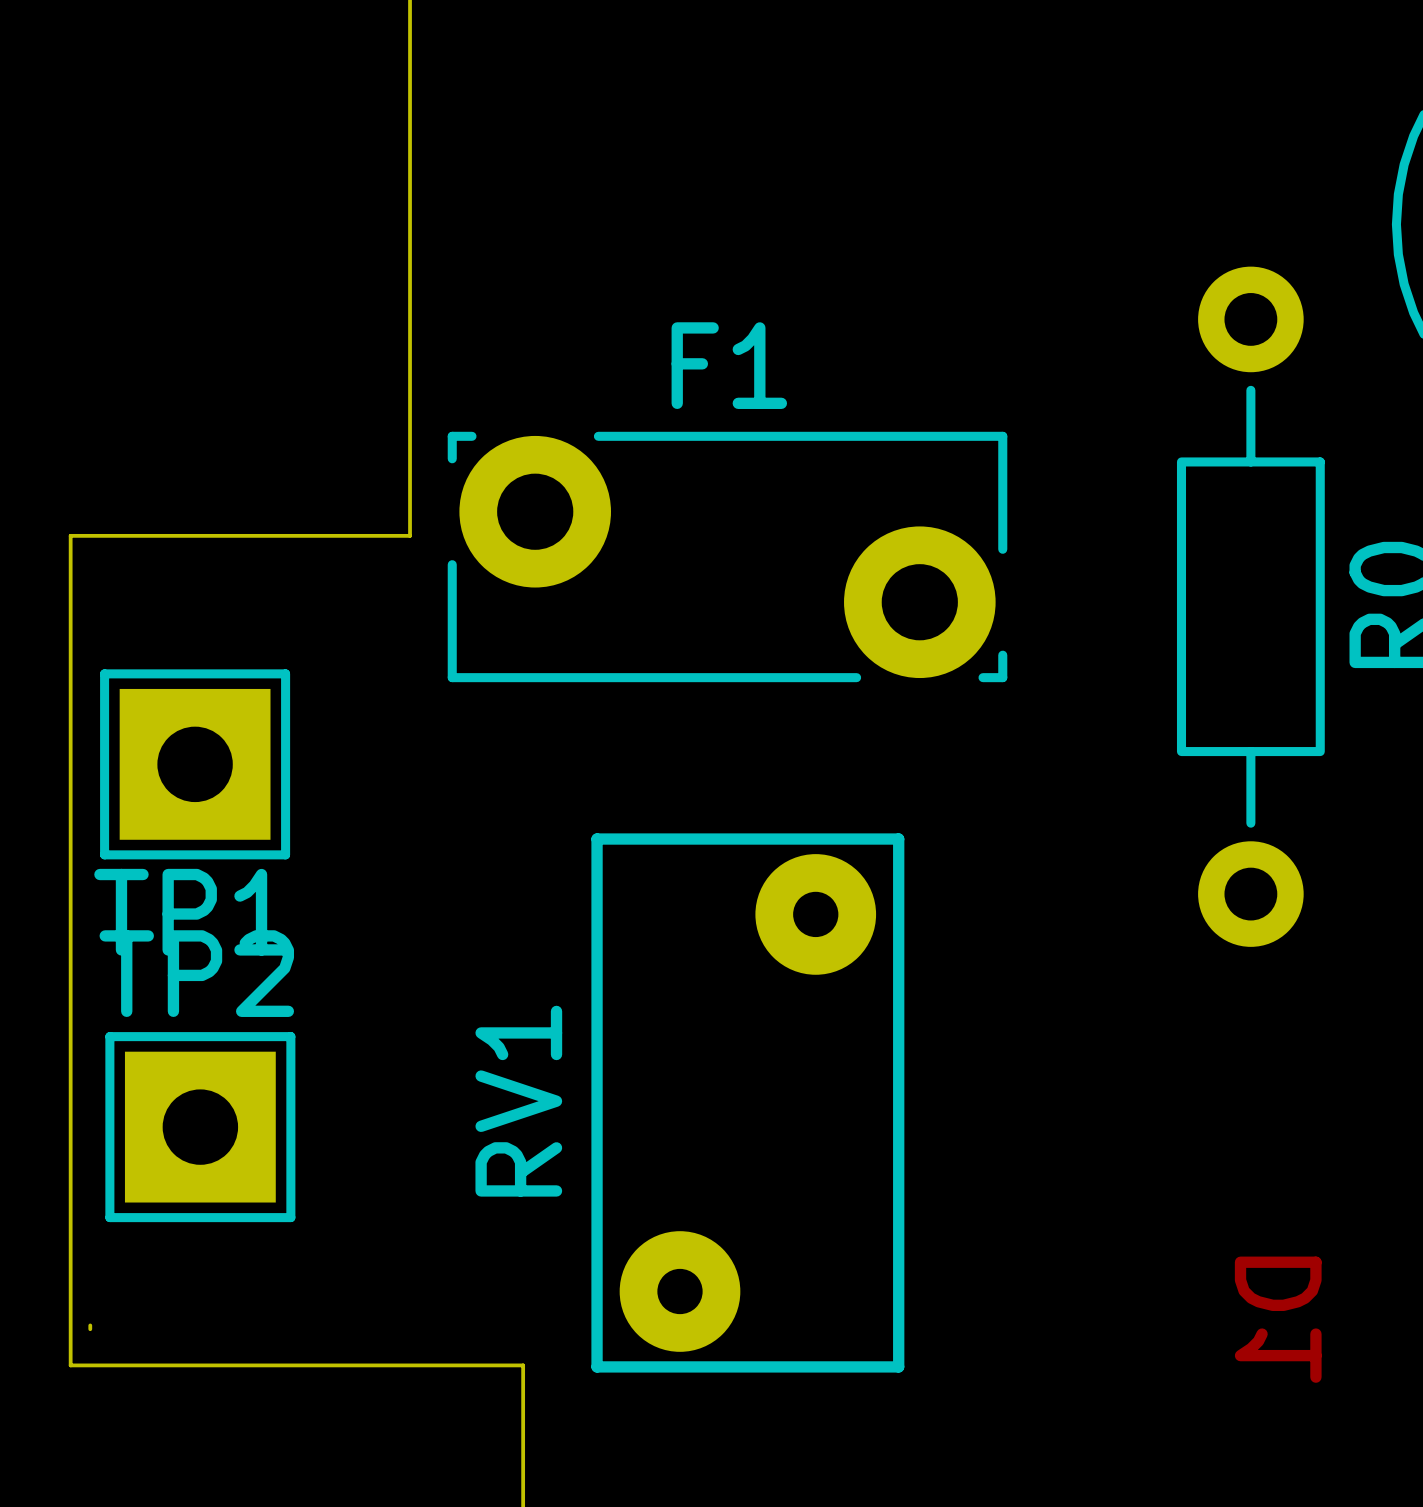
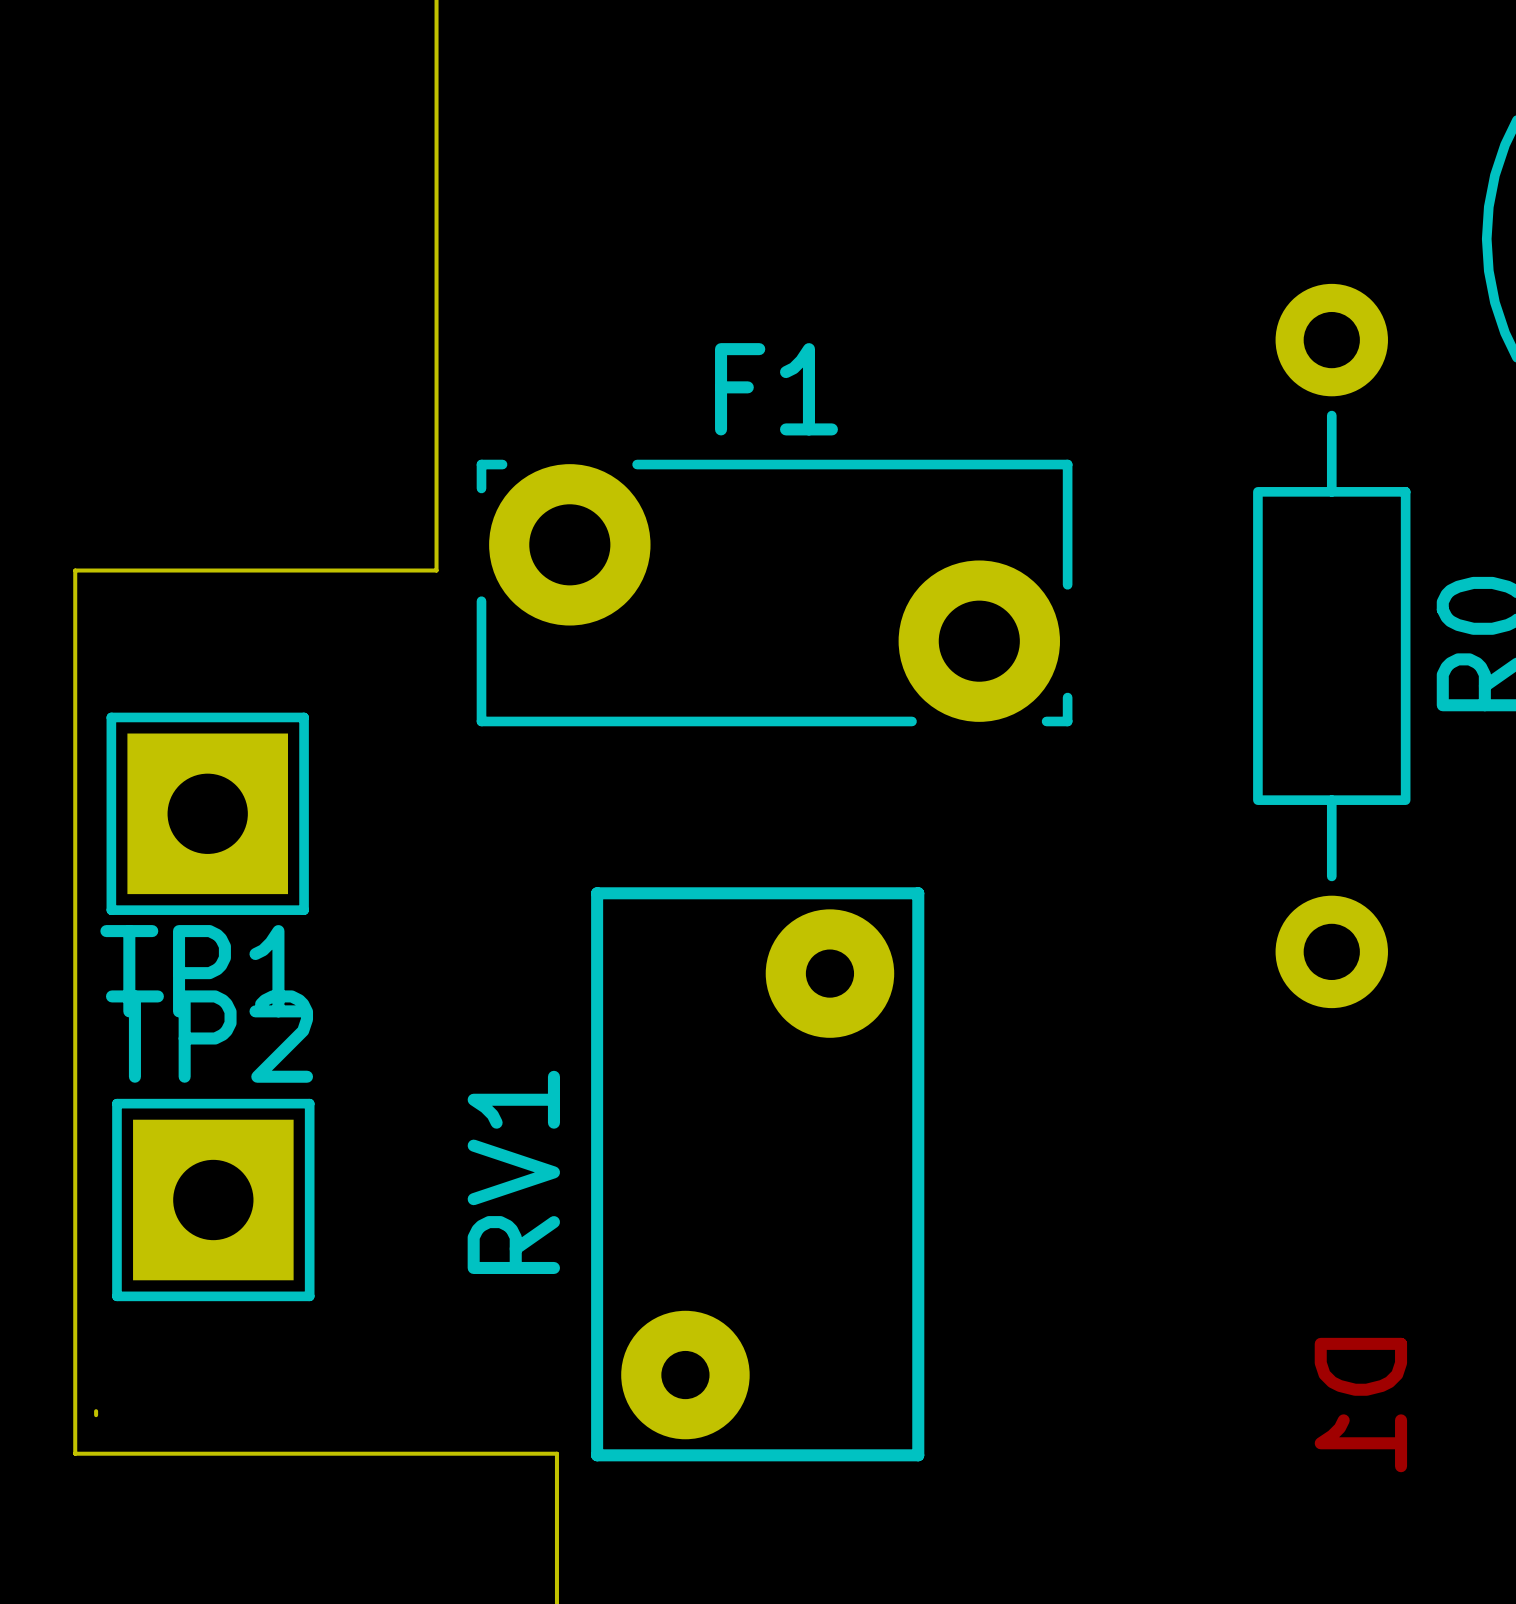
RV1 position: (747, 1102) -> (757, 1174)

